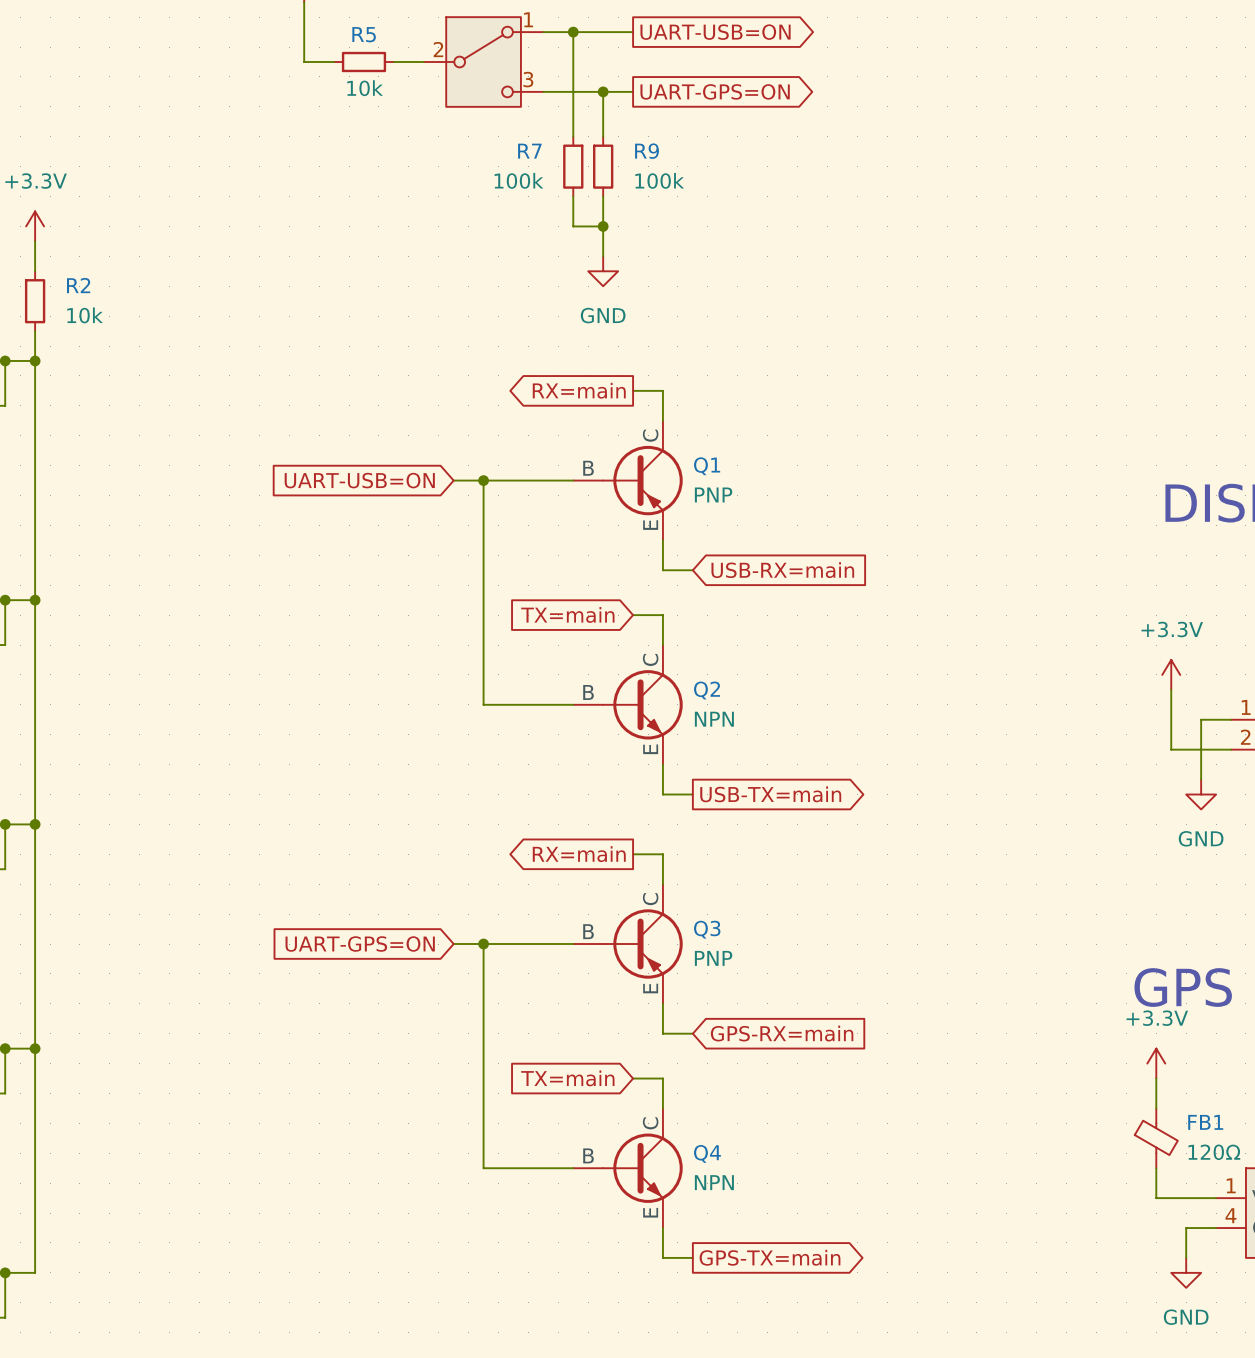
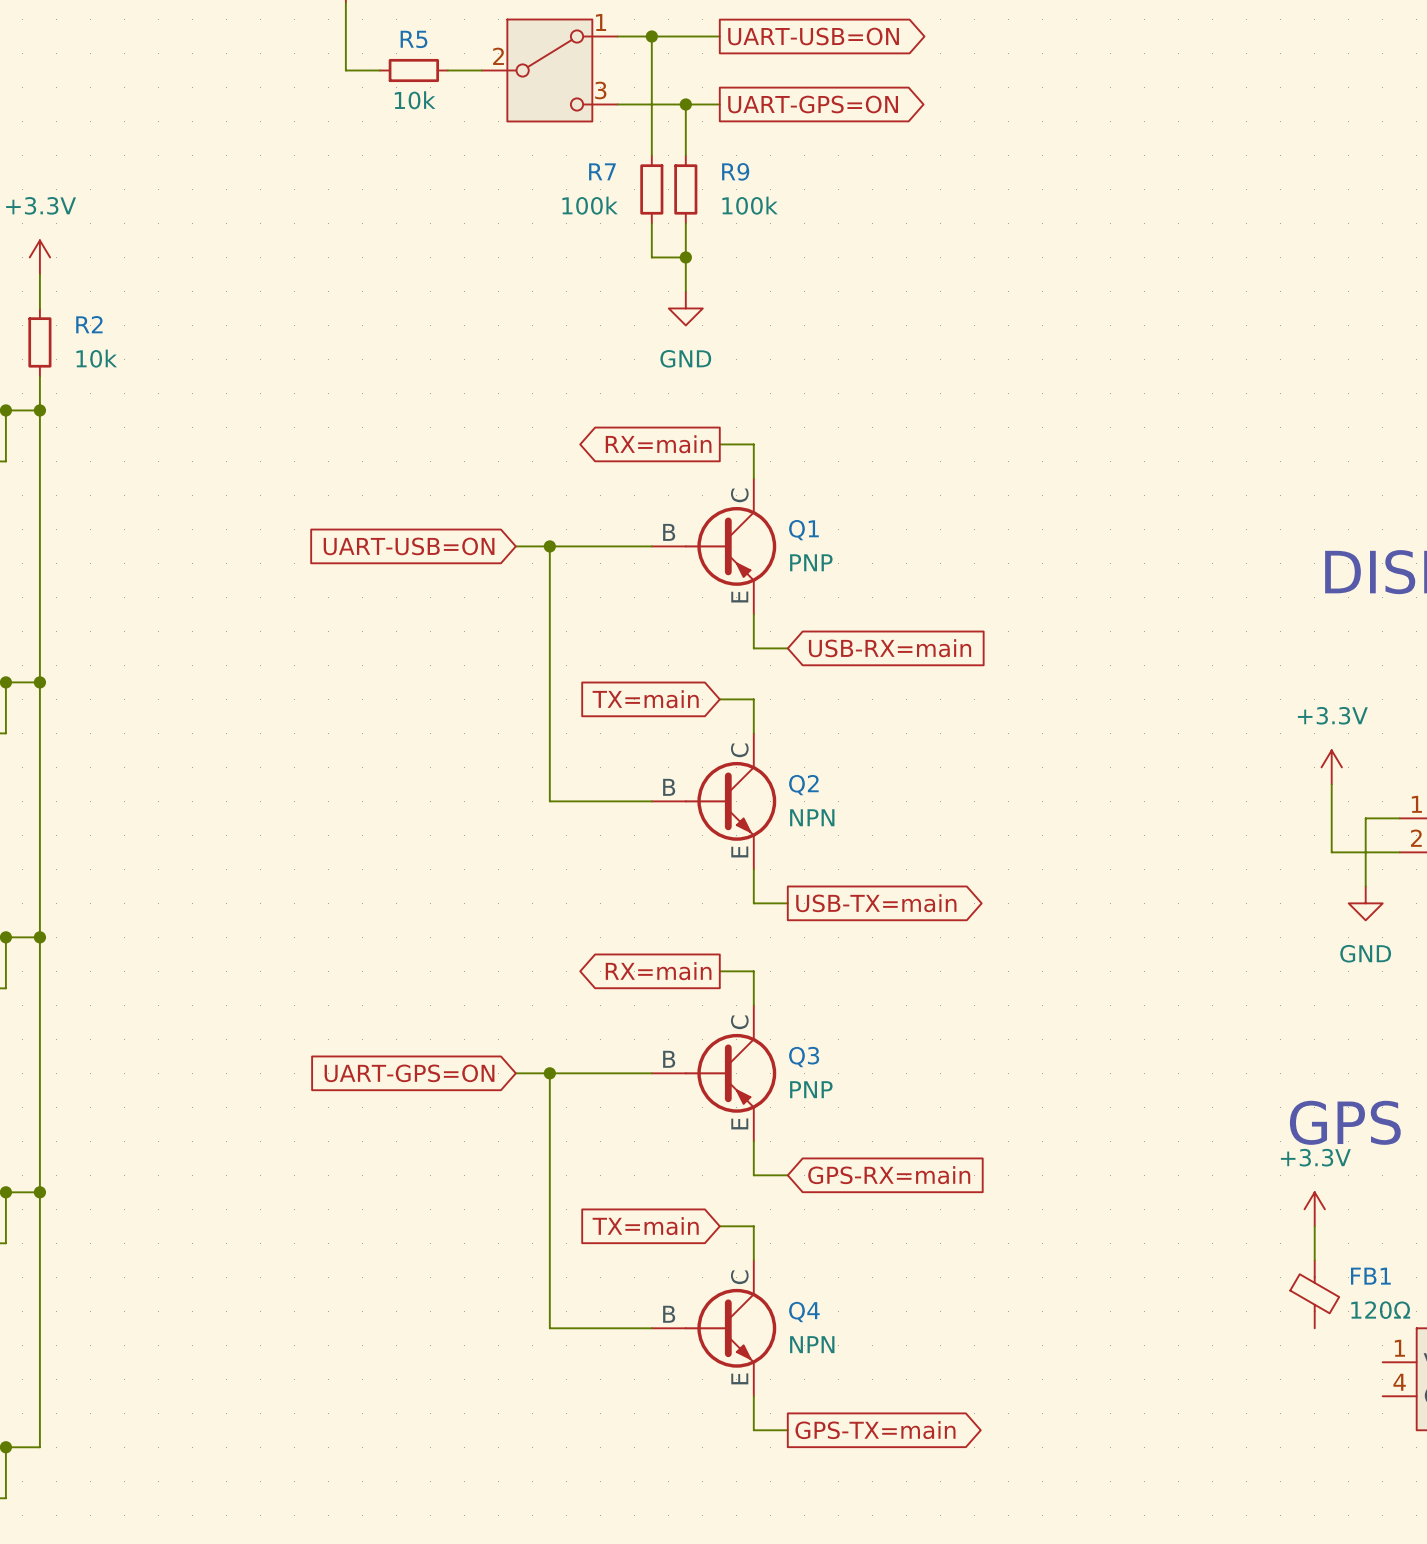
wire: (1156, 1168) (1156, 1198) (1216, 1198) -> none
wire: (1216, 1228) (1186, 1228) (1186, 1257) -> none
power symbol: GND (1186, 1272) -> none

